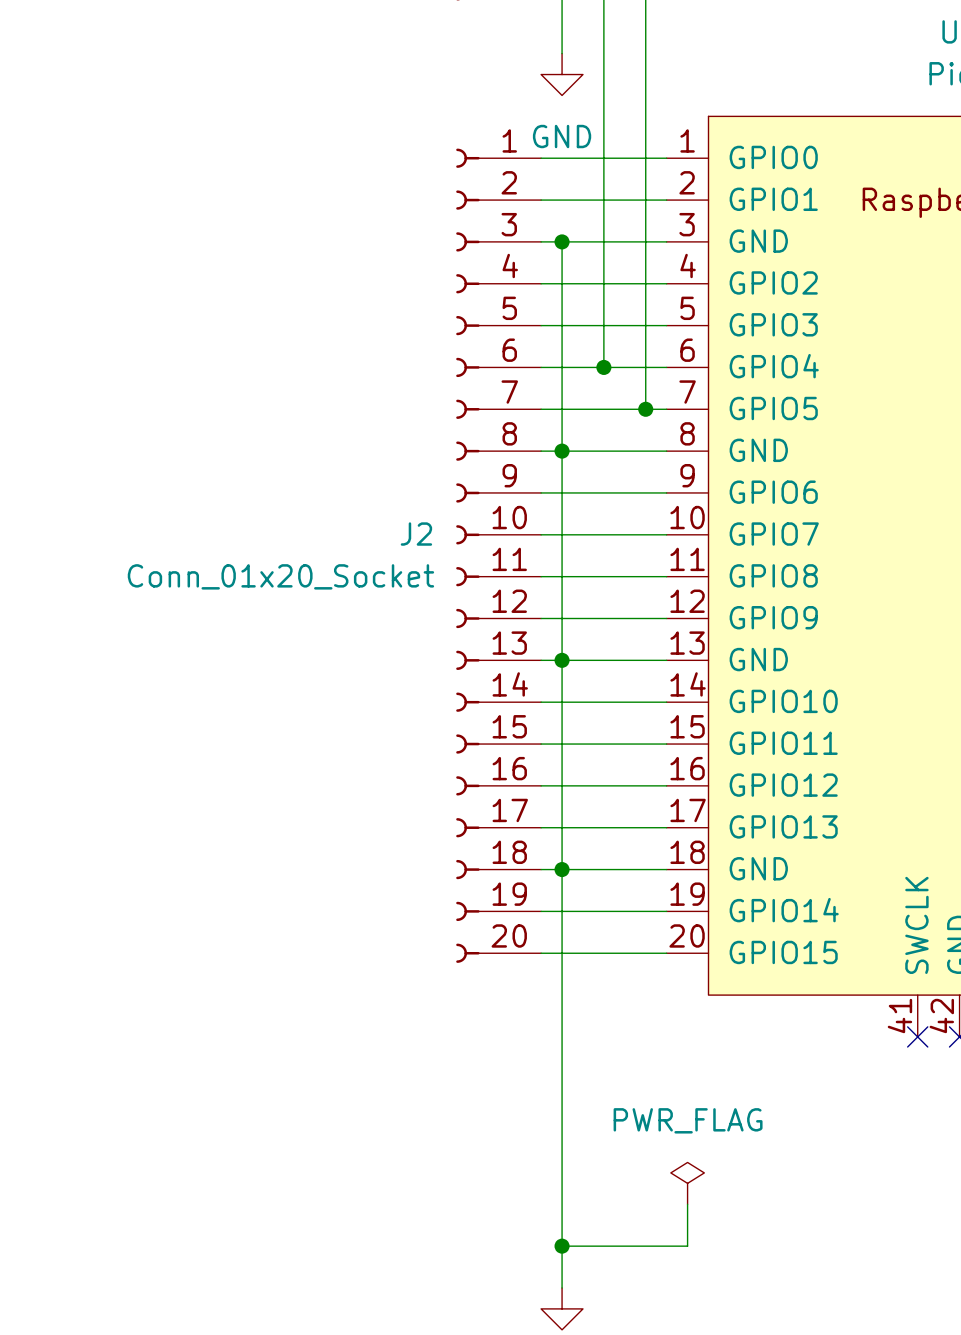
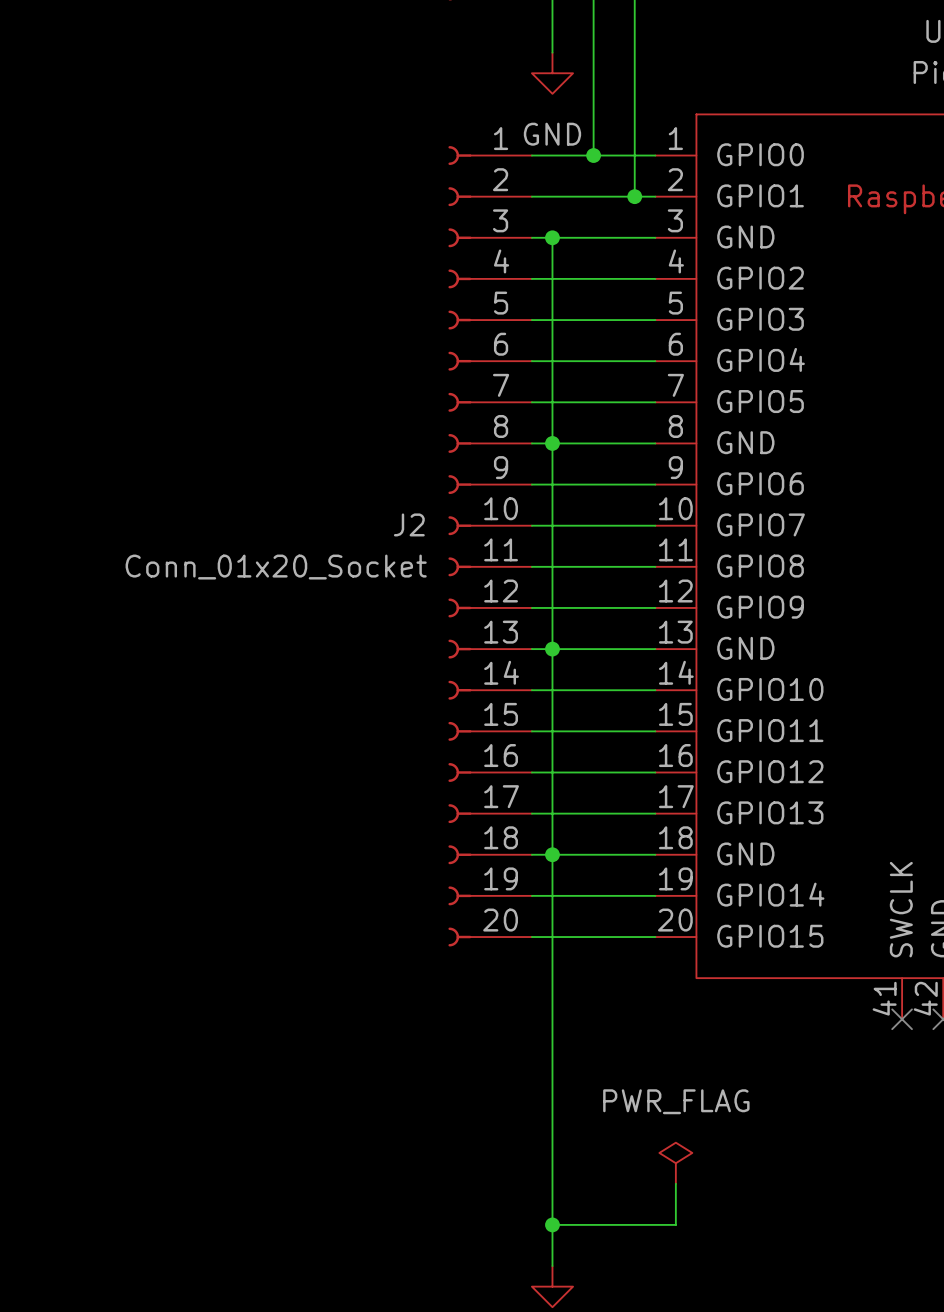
wire: (603, 158) (603, 367) -> none
junction: none -> (593, 155)
wire: (645, 200) (645, 409) -> none
junction: none -> (634, 196)
junction: (603, 367) -> none
junction: (645, 409) -> none

